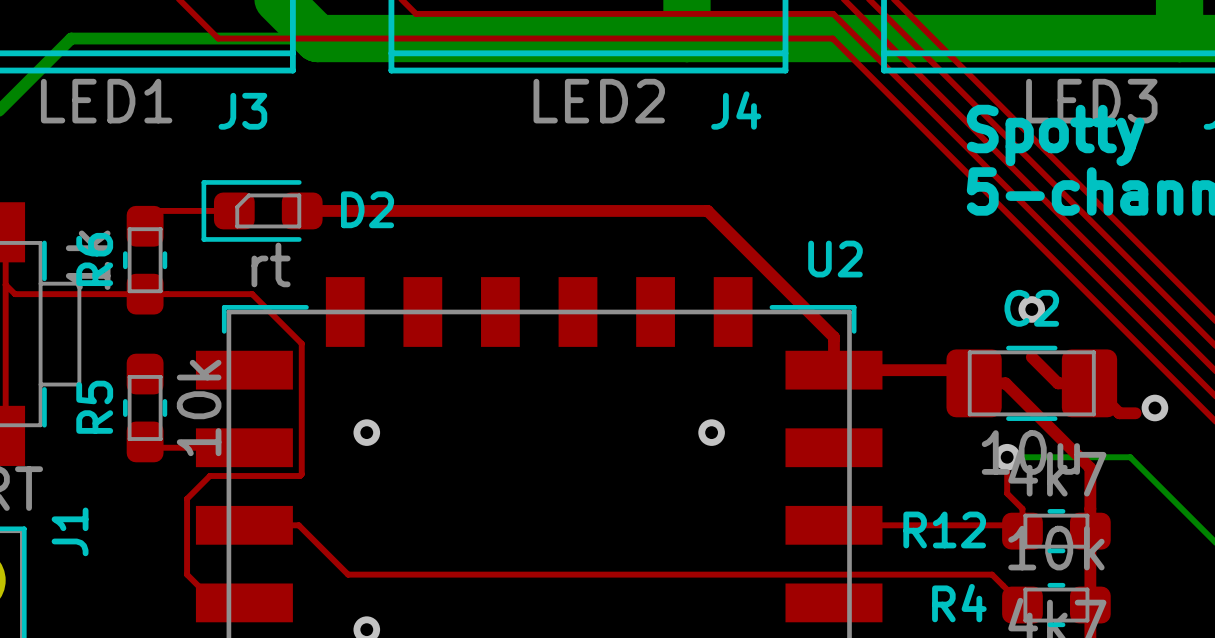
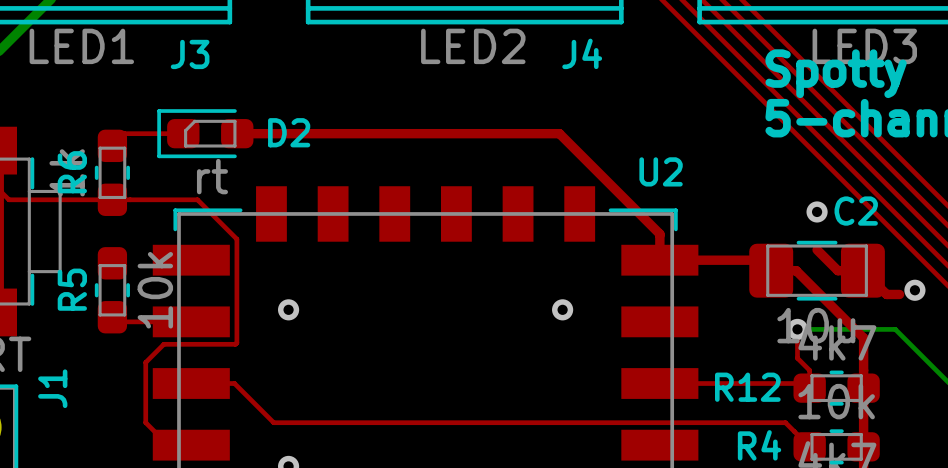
C2 name position: C2 (1031, 308) -> C2 (856, 211)

